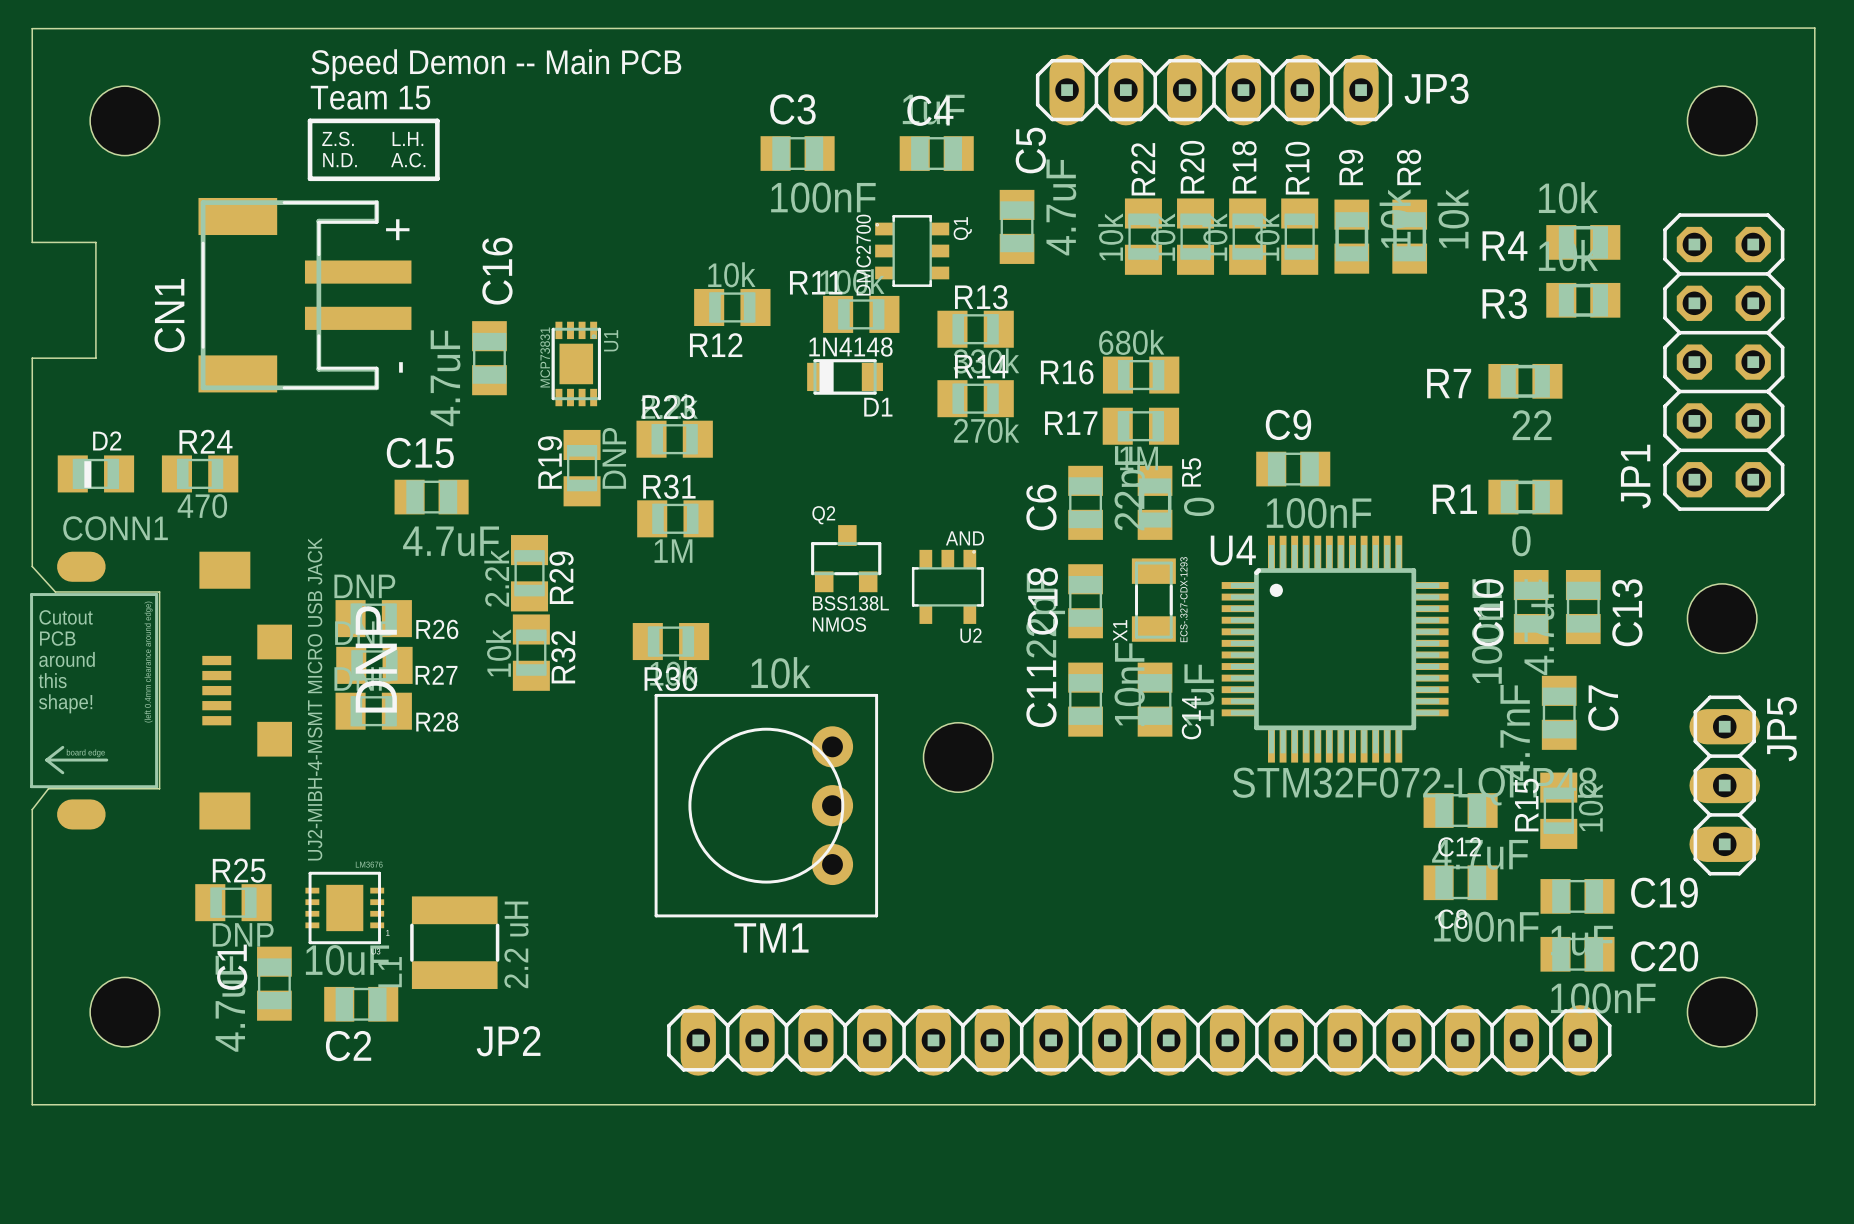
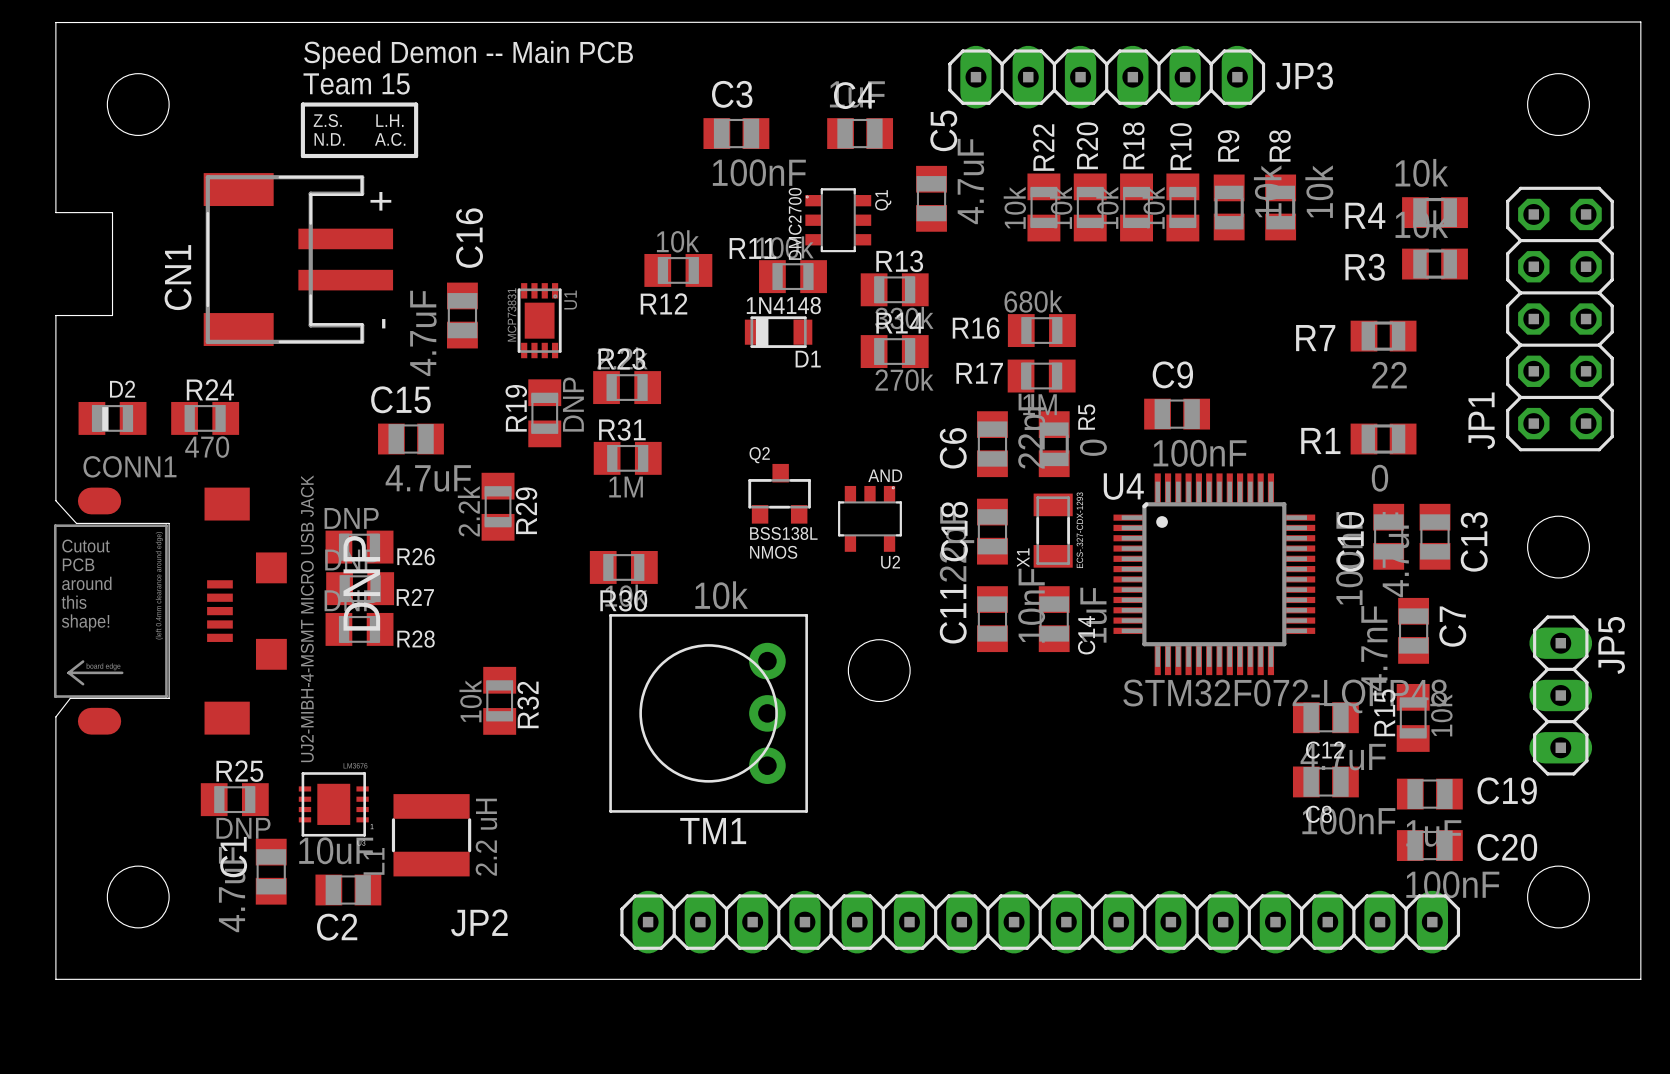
R32 position: (531, 652) -> (499, 700)

